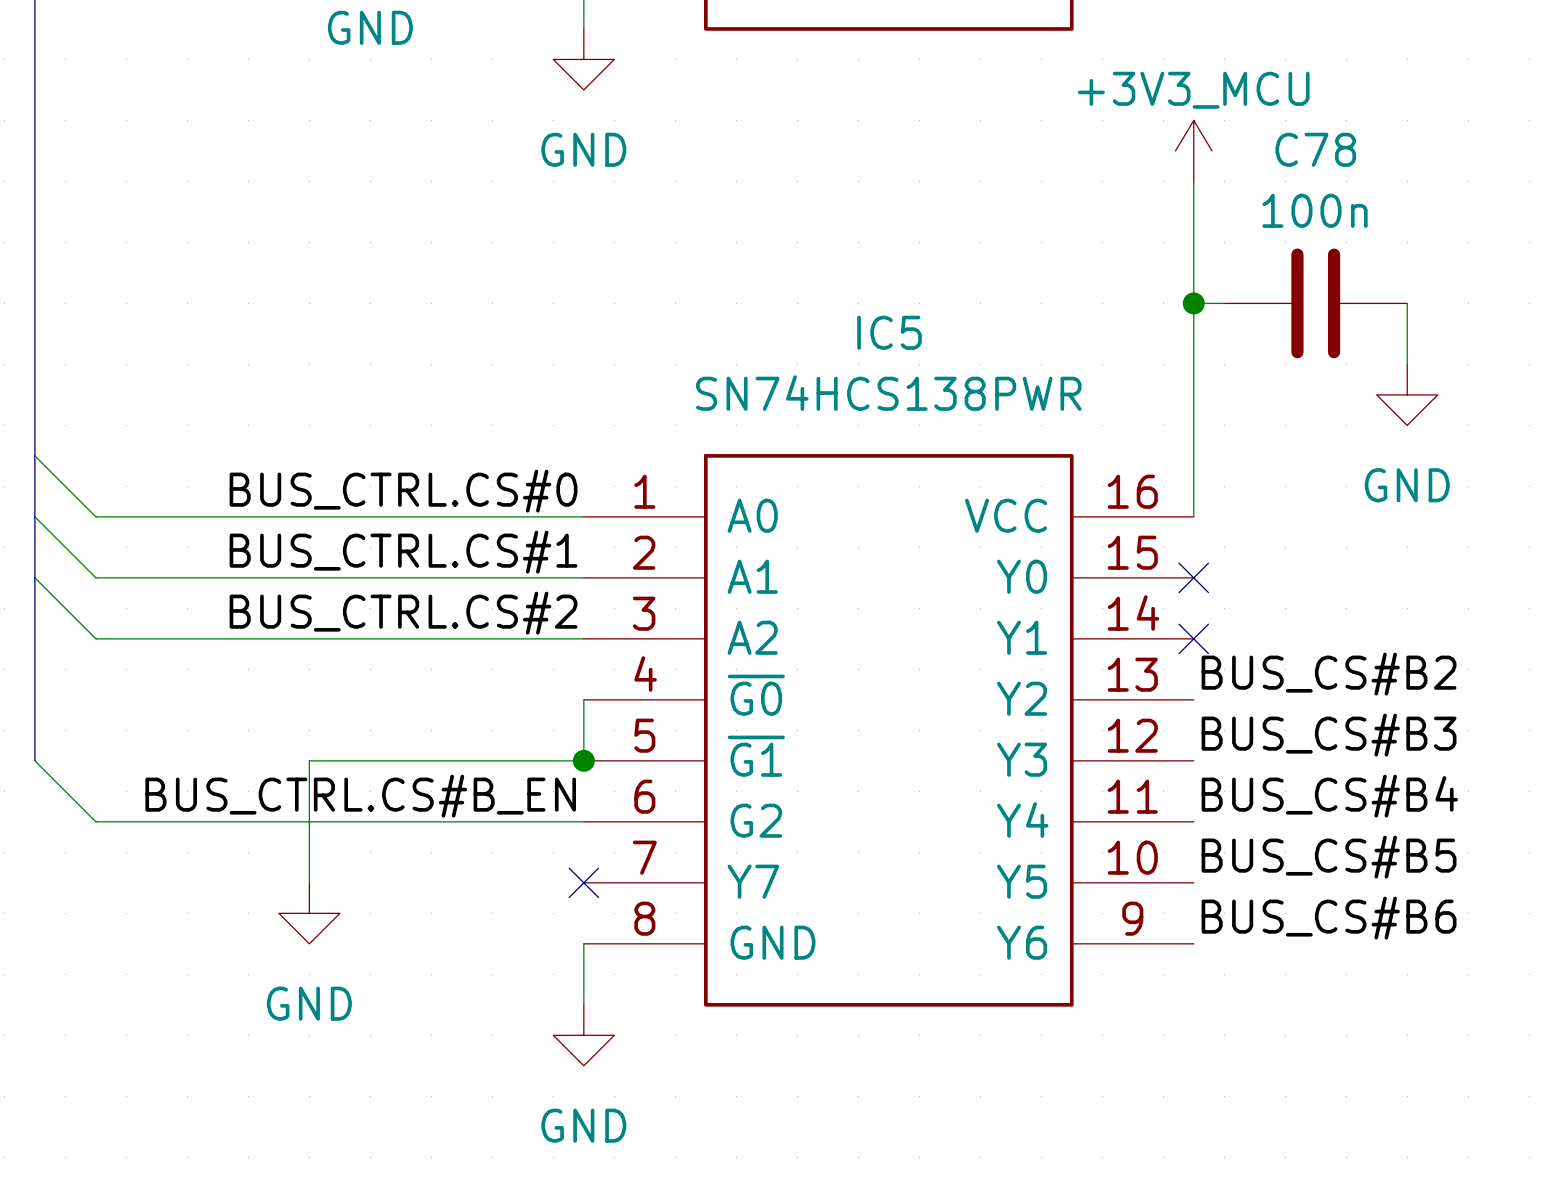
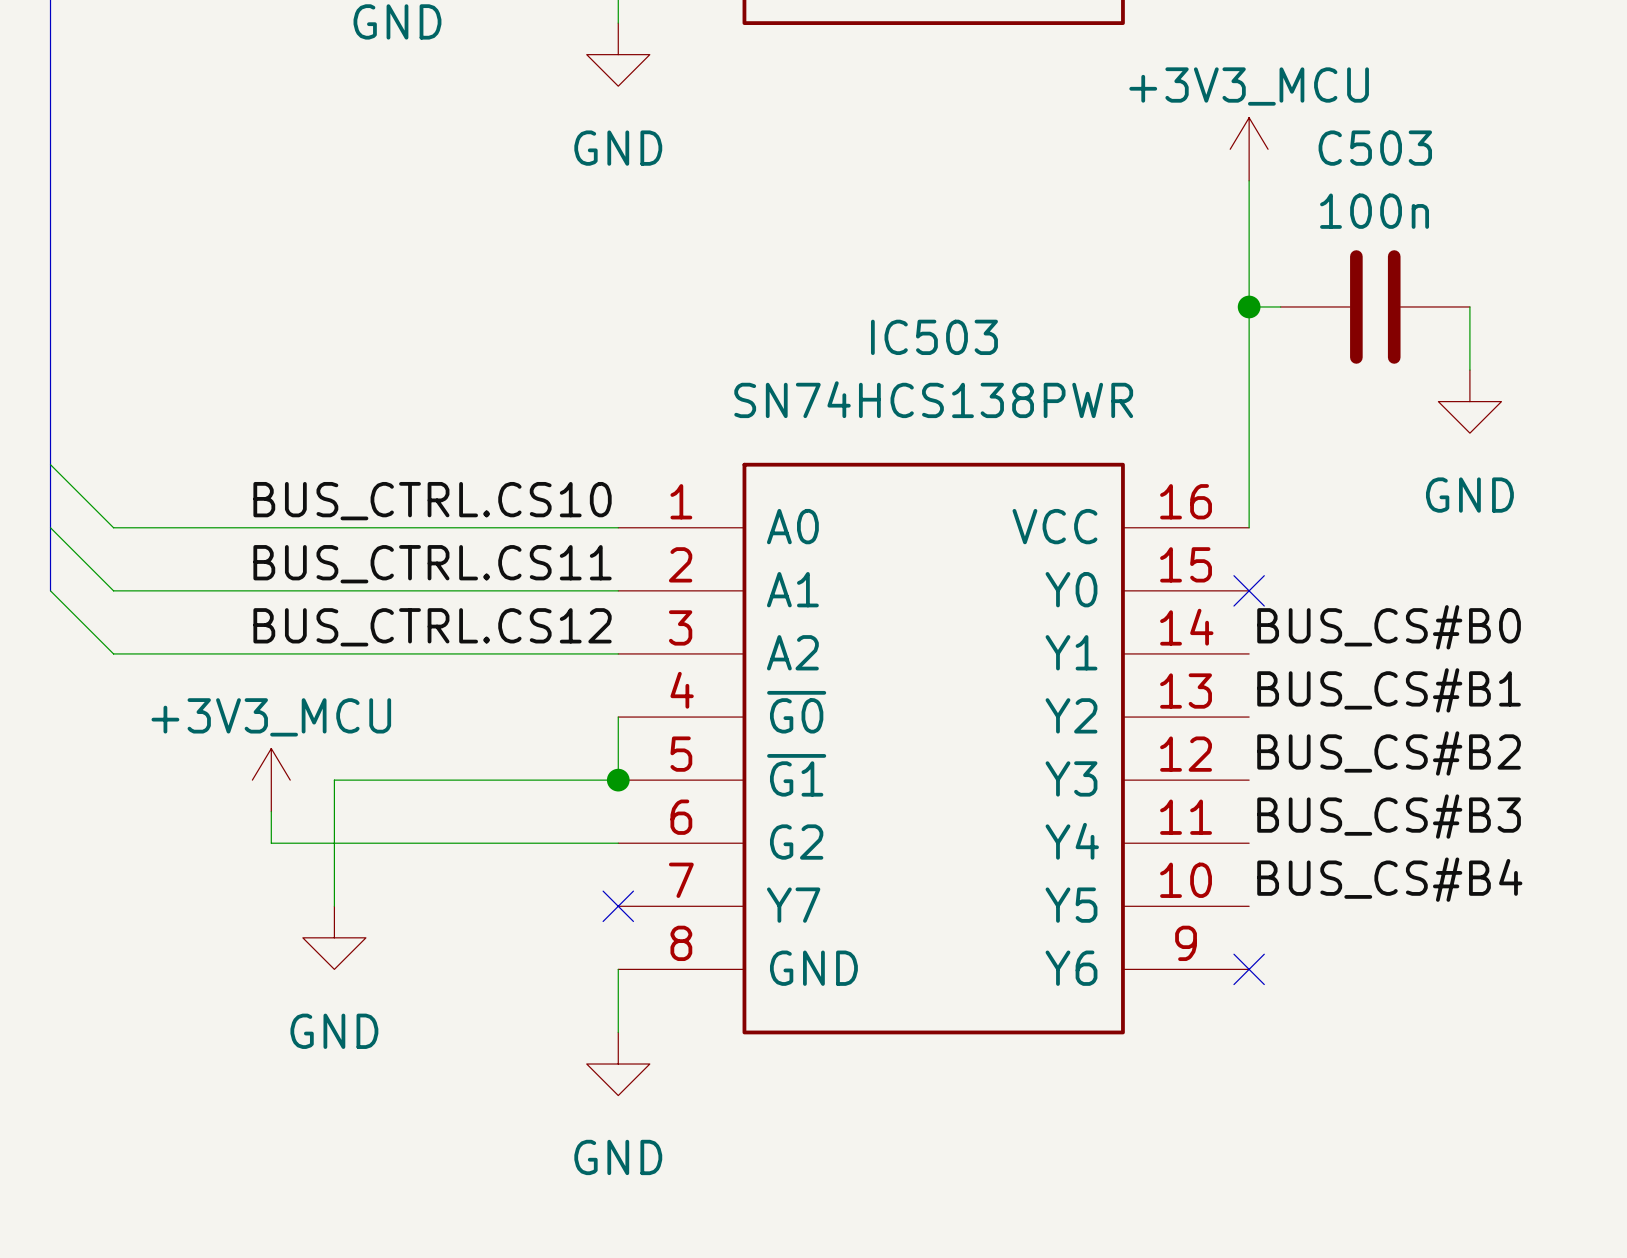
C78 name: C78 (1315, 149) -> C503 (1375, 148)
IC5 name: IC5 (889, 332) -> IC503 (934, 337)
label: BUS_CTRL.CS#0 (403, 491) -> BUS_CTRL.CS10 (432, 501)
label: BUS_CTRL.CS#1 (403, 552) -> BUS_CTRL.CS11 (432, 564)
bus: (34, 577) (34, 760) -> none
label: BUS_CTRL.CS#2 (403, 613) -> BUS_CTRL.CS12 (432, 627)
label: none -> BUS_CS#B0 (1389, 627)
no-connect mark: (1193, 638) -> none
label: BUS_CS#B2 (1329, 674) -> BUS_CS#B1 (1389, 690)
label: BUS_CS#B3 (1329, 735) -> BUS_CS#B2 (1389, 753)
wire: (34, 760) (95, 821) (248, 821) -> (271, 811) (271, 843)
power symbol: none -> +3V3_MCU (271, 780)
label: BUS_CTRL.CS#B_EN (360, 796) -> none
label: BUS_CS#B4 (1329, 796) -> BUS_CS#B3 (1389, 816)
label: BUS_CS#B5 (1329, 857) -> BUS_CS#B4 (1389, 879)
label: BUS_CS#B6 (1329, 918) -> none
no-connect mark: none -> (1249, 969)

